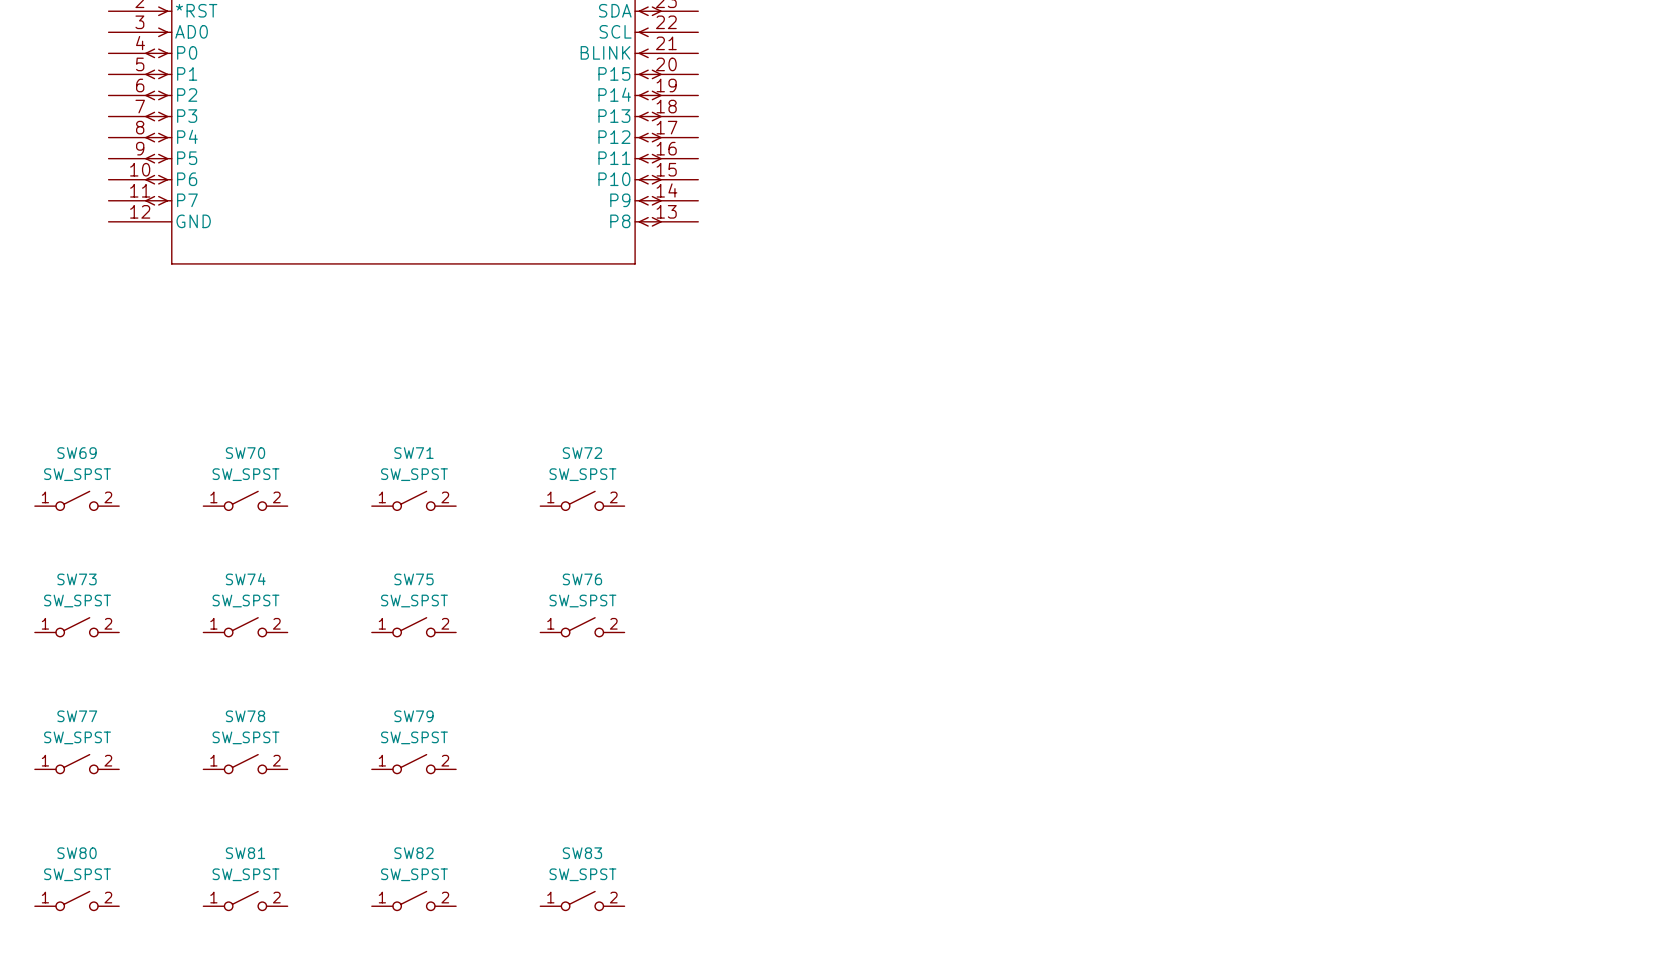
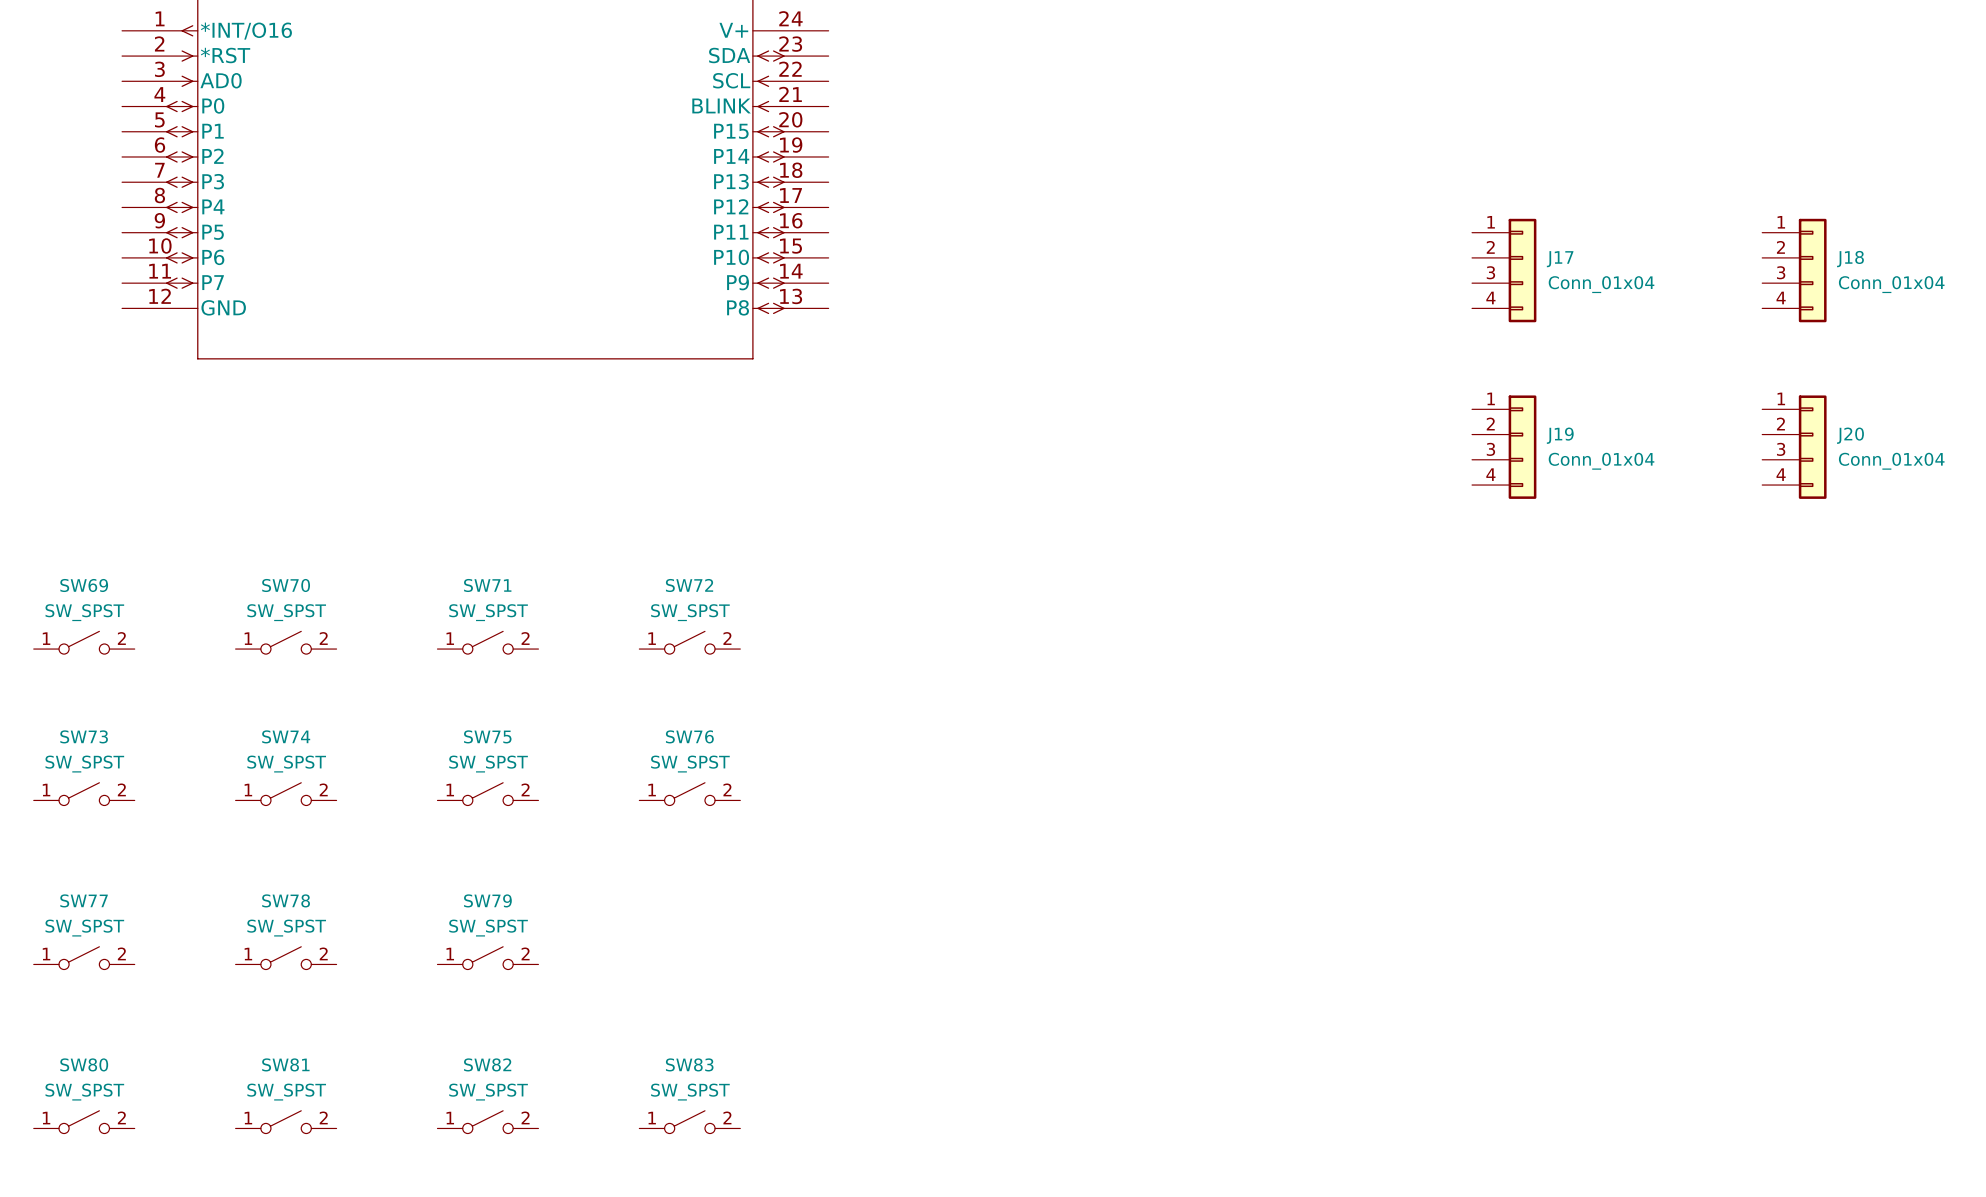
J17: none -> Conn_01x04 (1504, 270)
J18: none -> Conn_01x04 (1794, 270)
J19: none -> Conn_01x04 (1504, 447)
J20: none -> Conn_01x04 (1794, 447)

